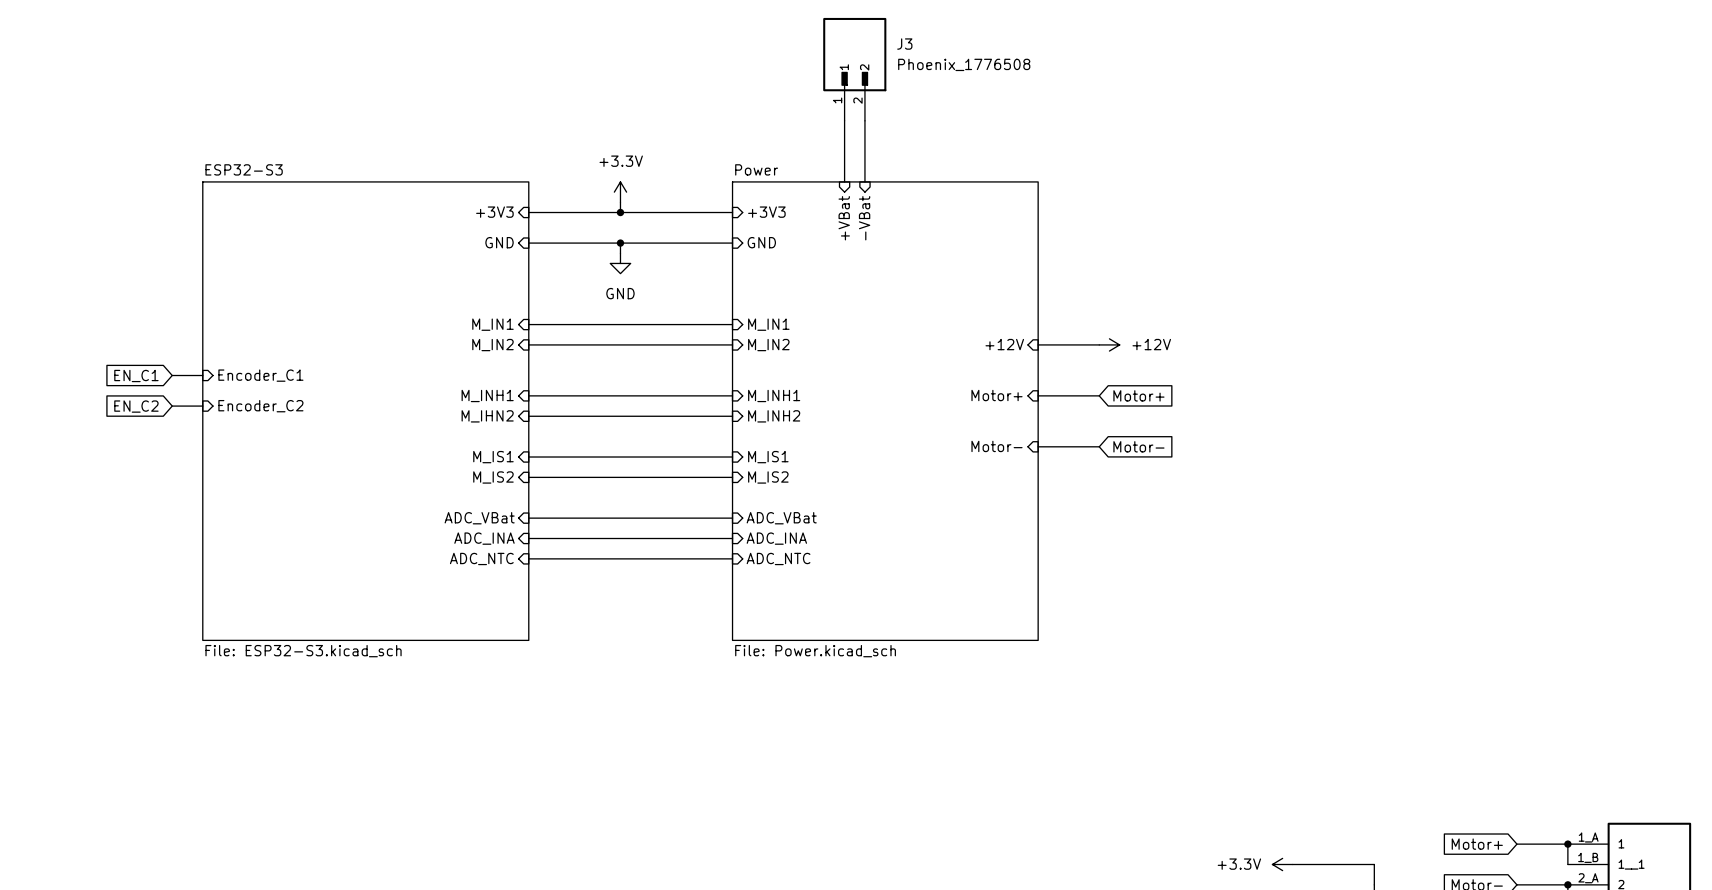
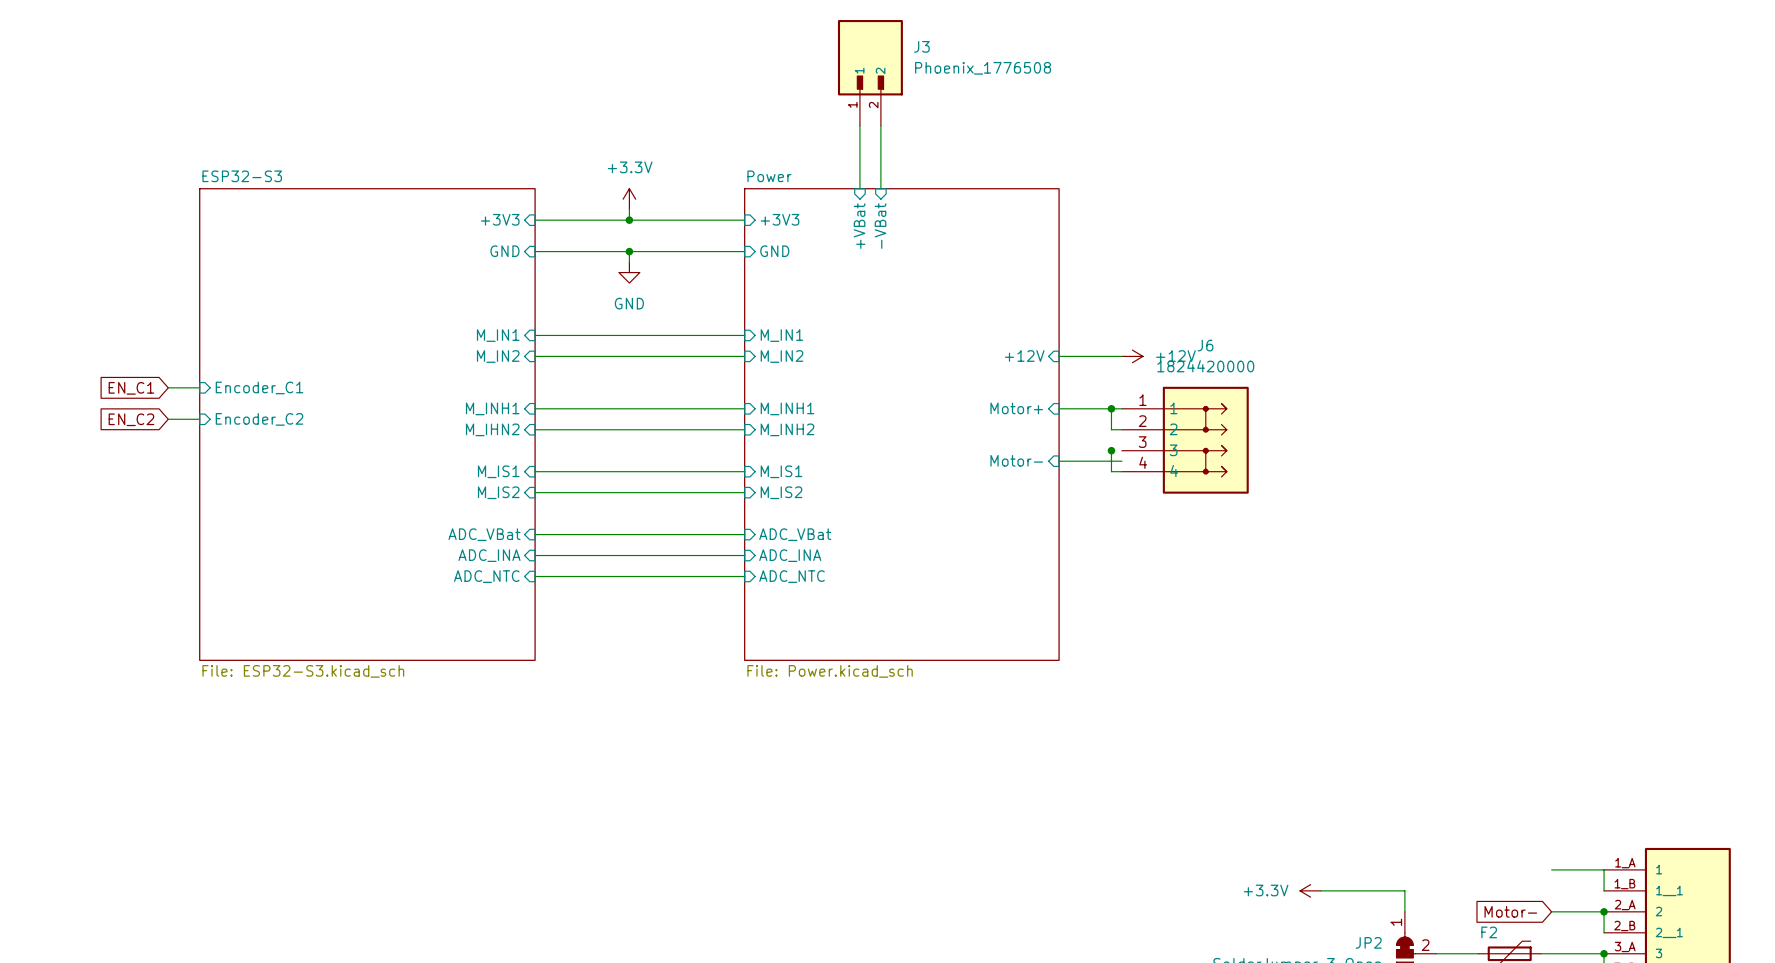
wire: none -> (1111, 408) (1111, 429) (1121, 429)
junction: none -> (1111, 408)
global label: Motor+ (1138, 395) -> none
J6: none -> 1824420000 (1185, 440)
wire: none -> (1111, 450) (1111, 471) (1121, 471)
junction: none -> (1111, 450)
global label: Motor- (1138, 446) -> none
global label: Motor+ (1477, 844) -> none
junction: (1567, 844) -> none

